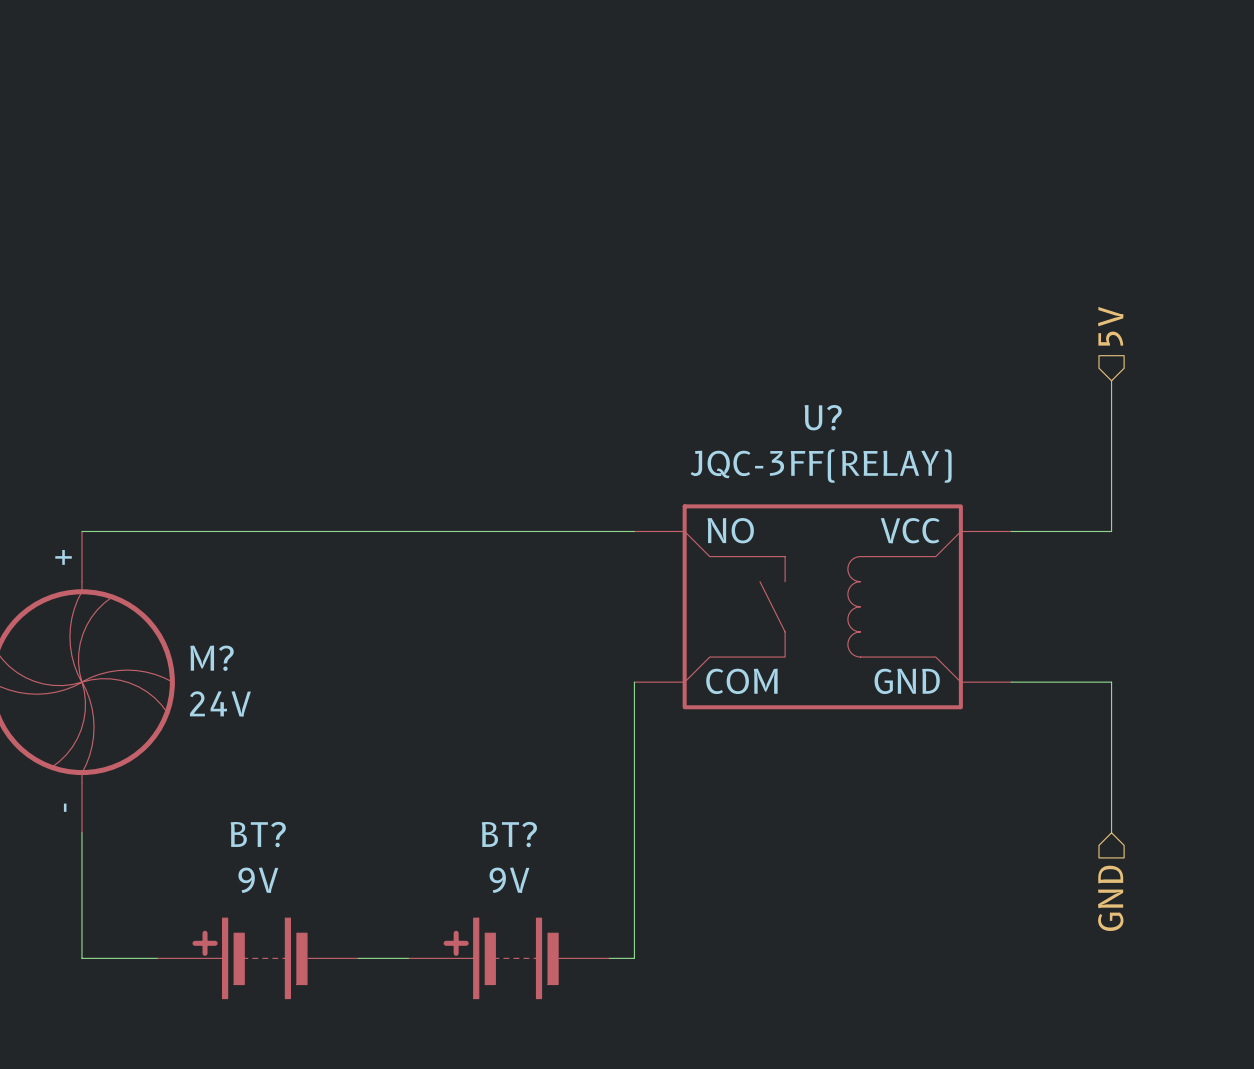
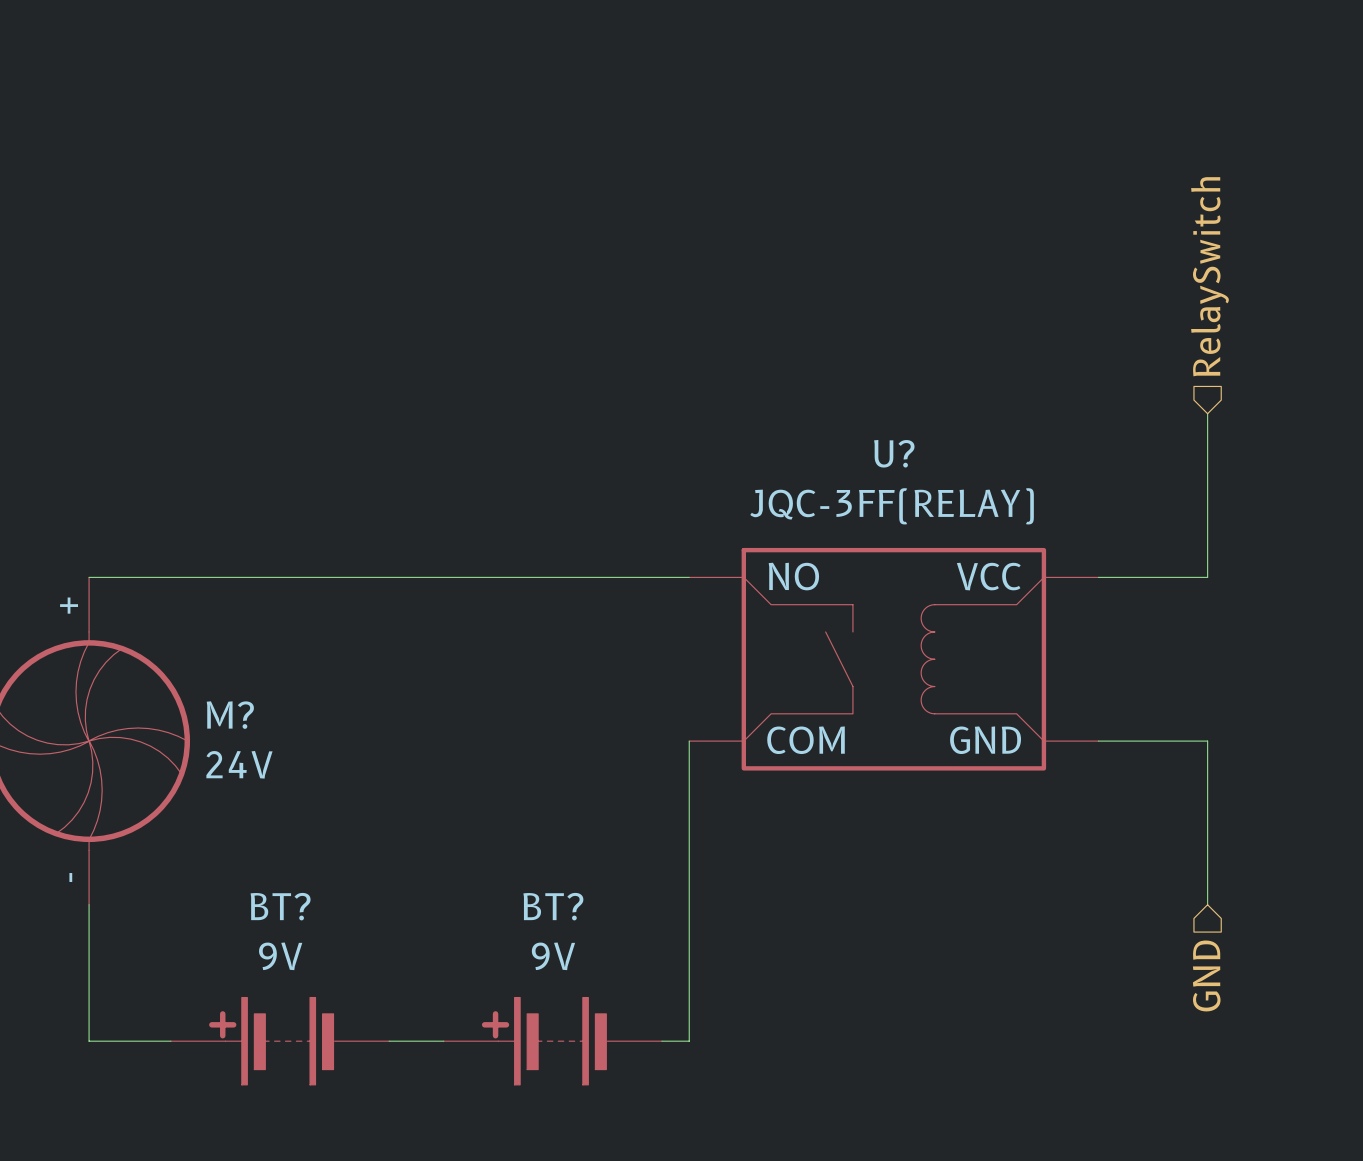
hierarchical label: 5V (1110, 326) -> RelaySwitch (1209, 276)

